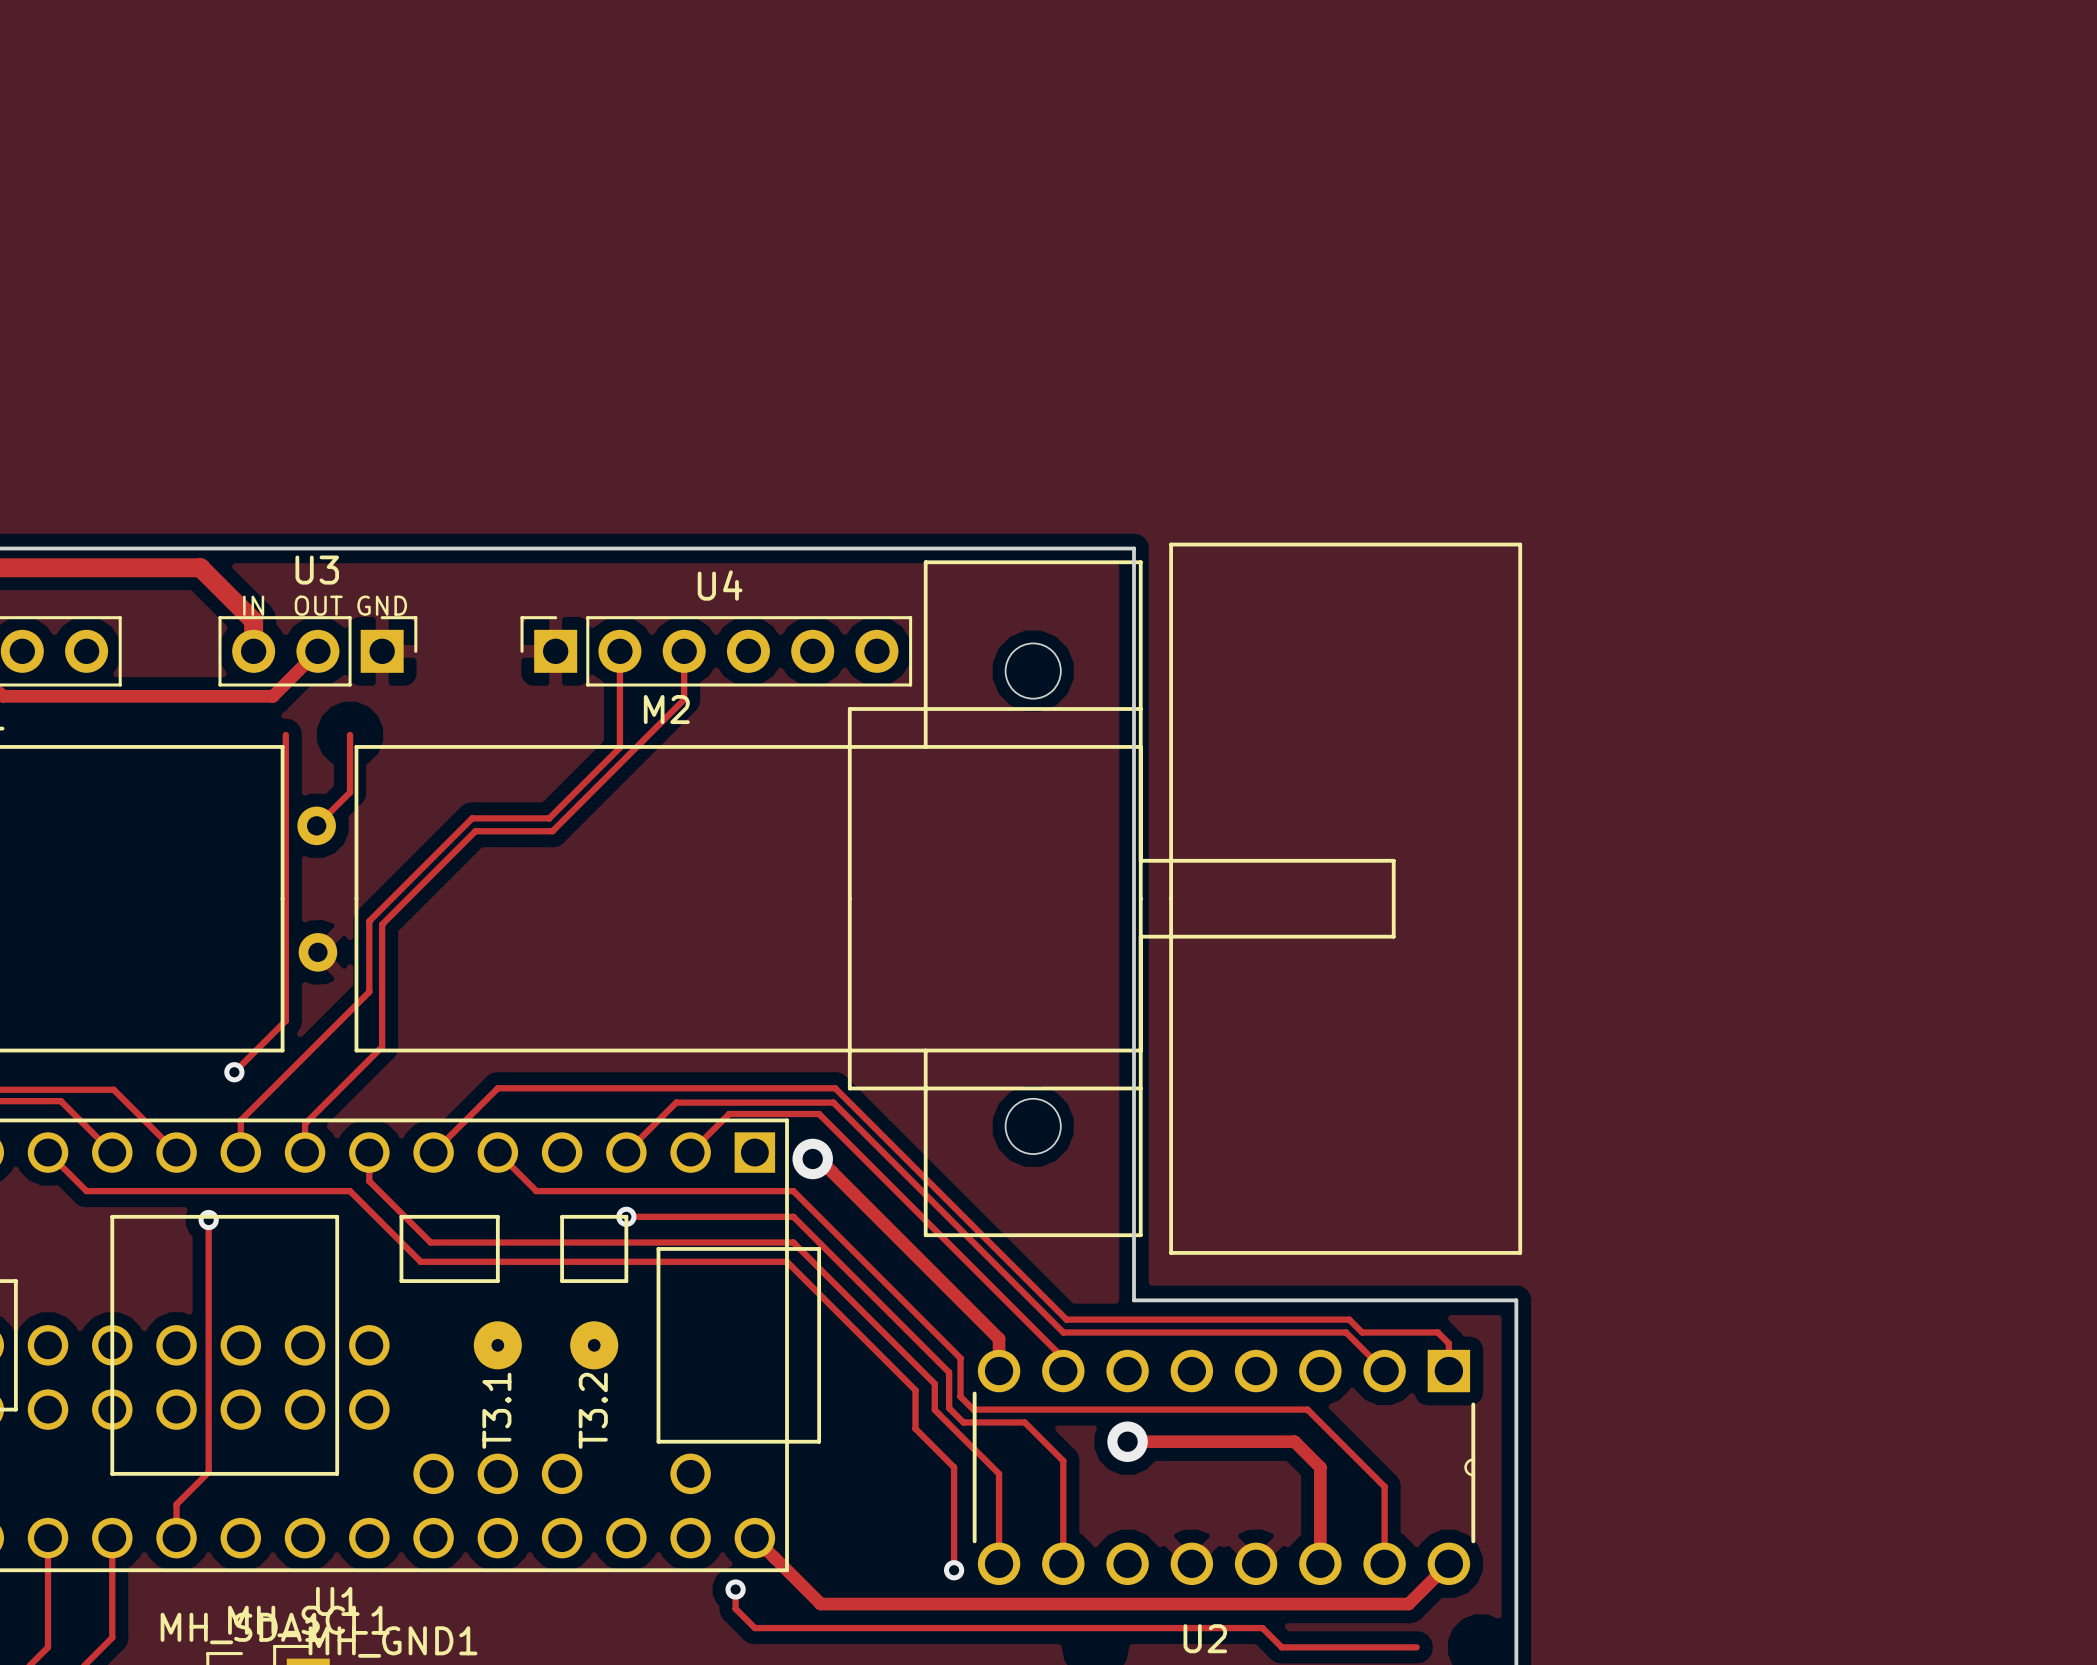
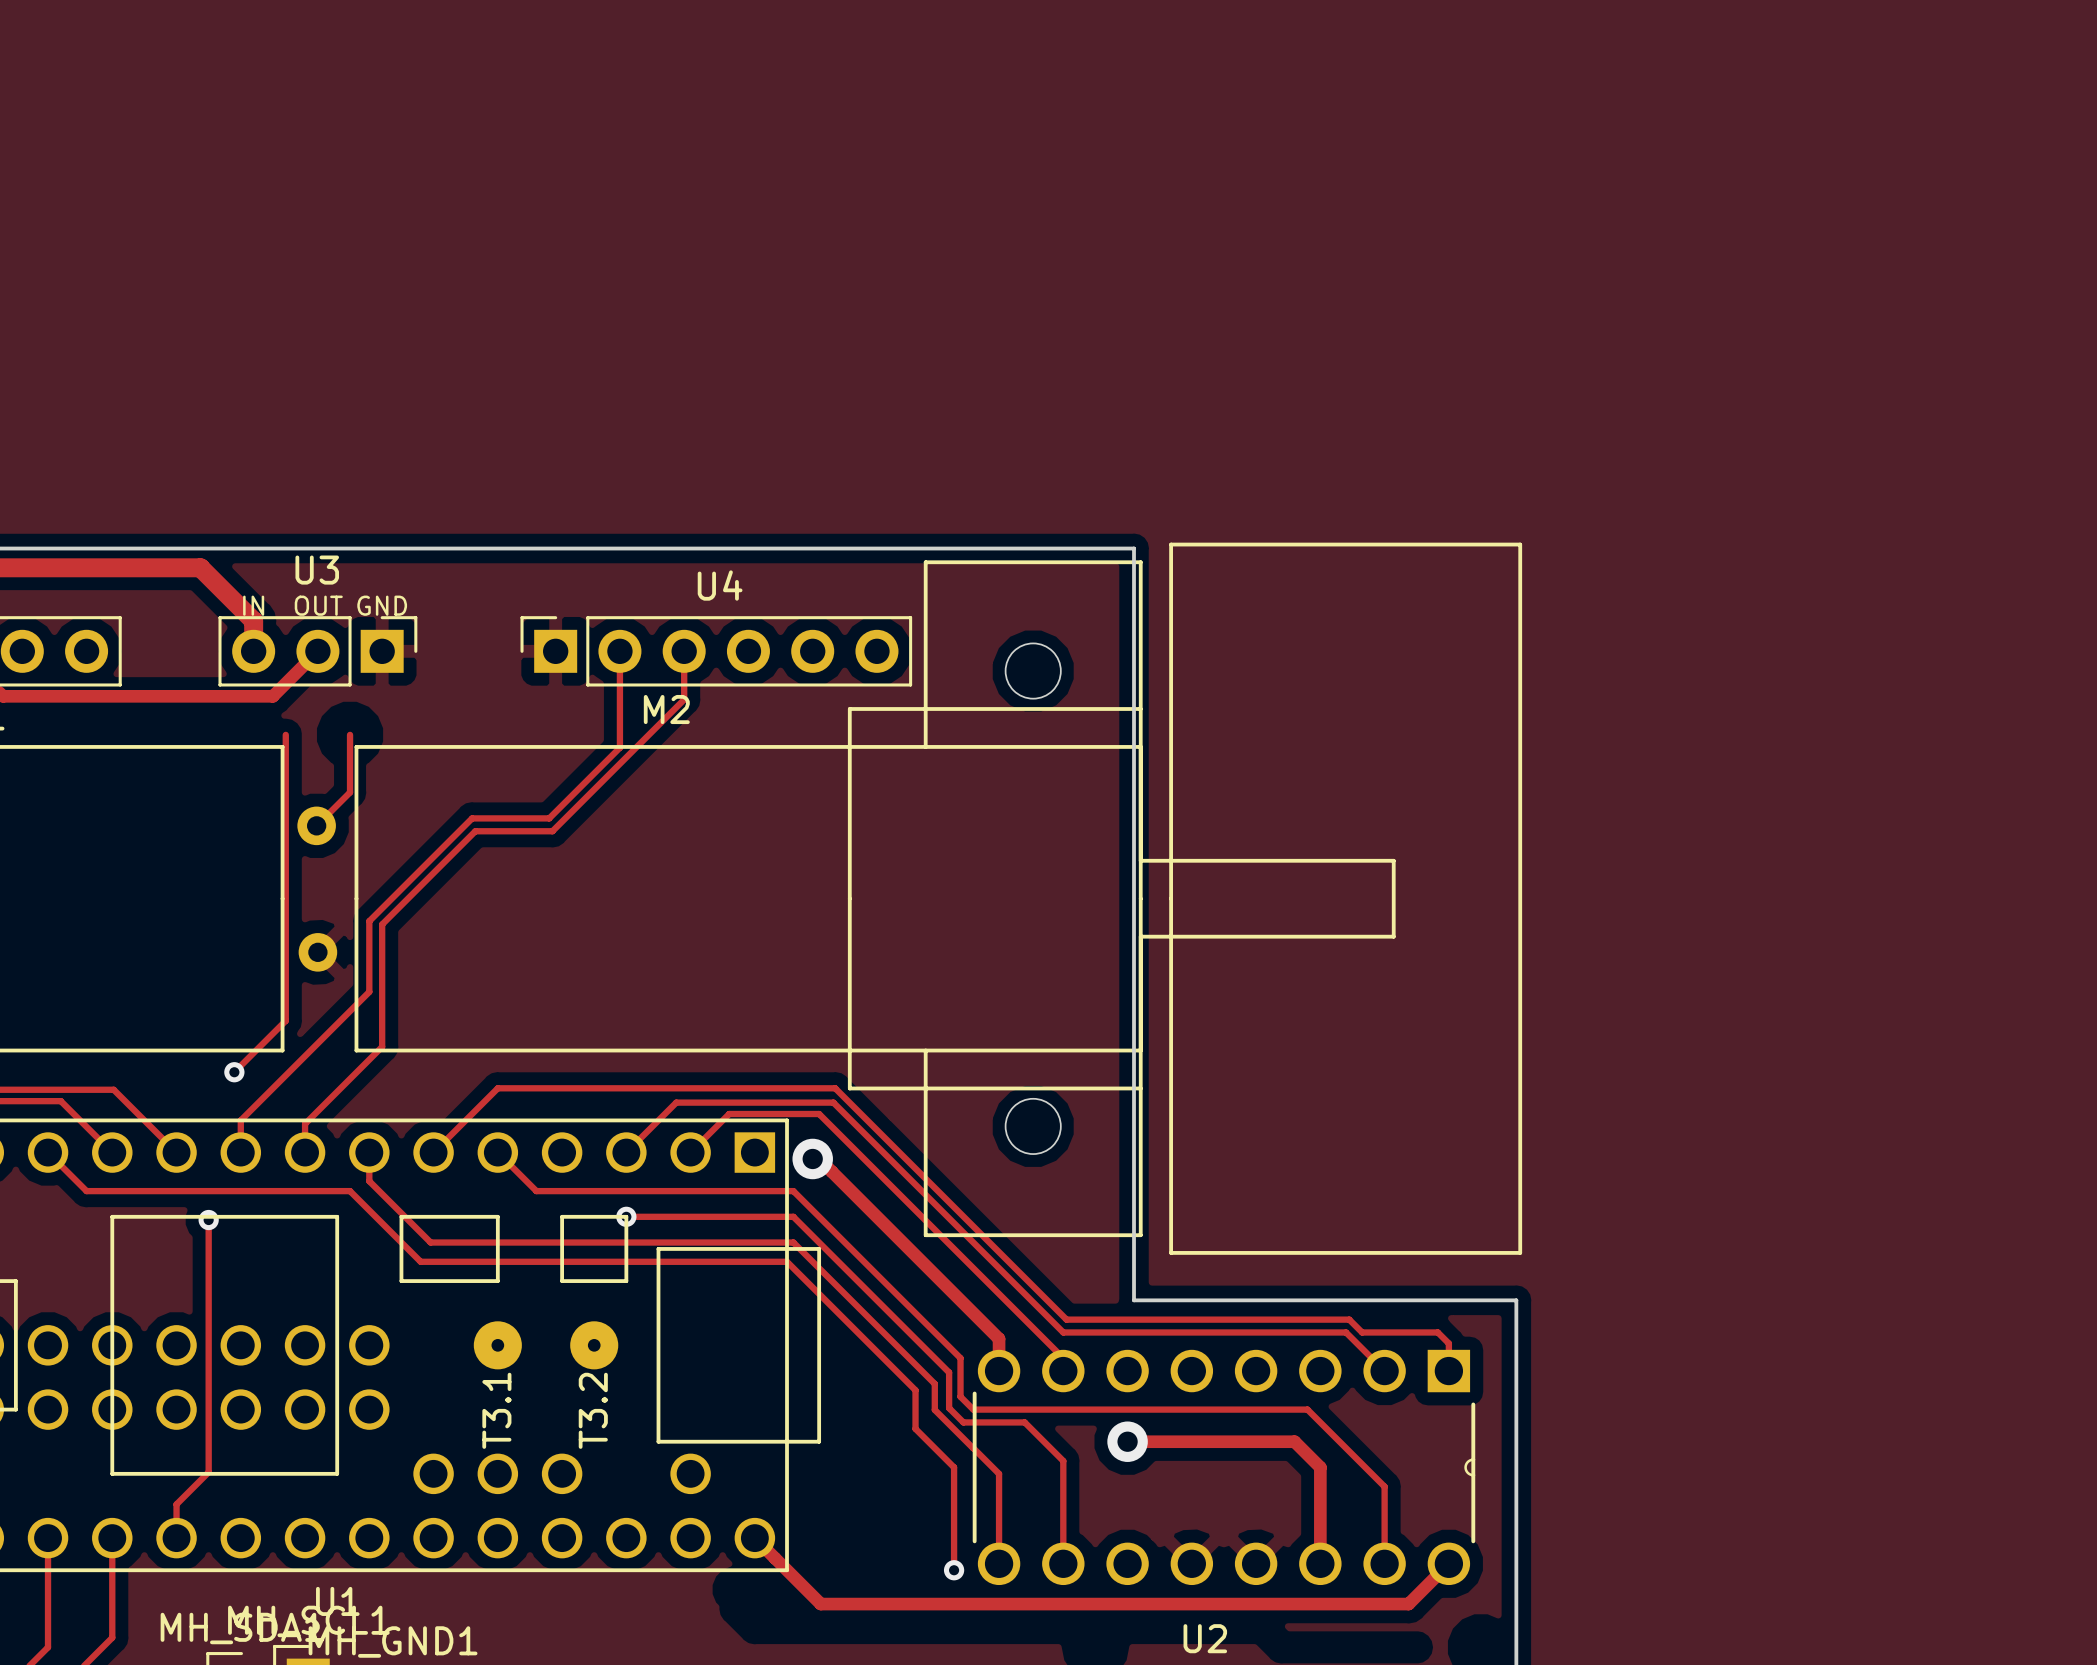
track: (735, 1589) (735, 1608) (754, 1628) (1262, 1628) (1281, 1647) (1416, 1647) -> none
via: (735, 1589) -> none

